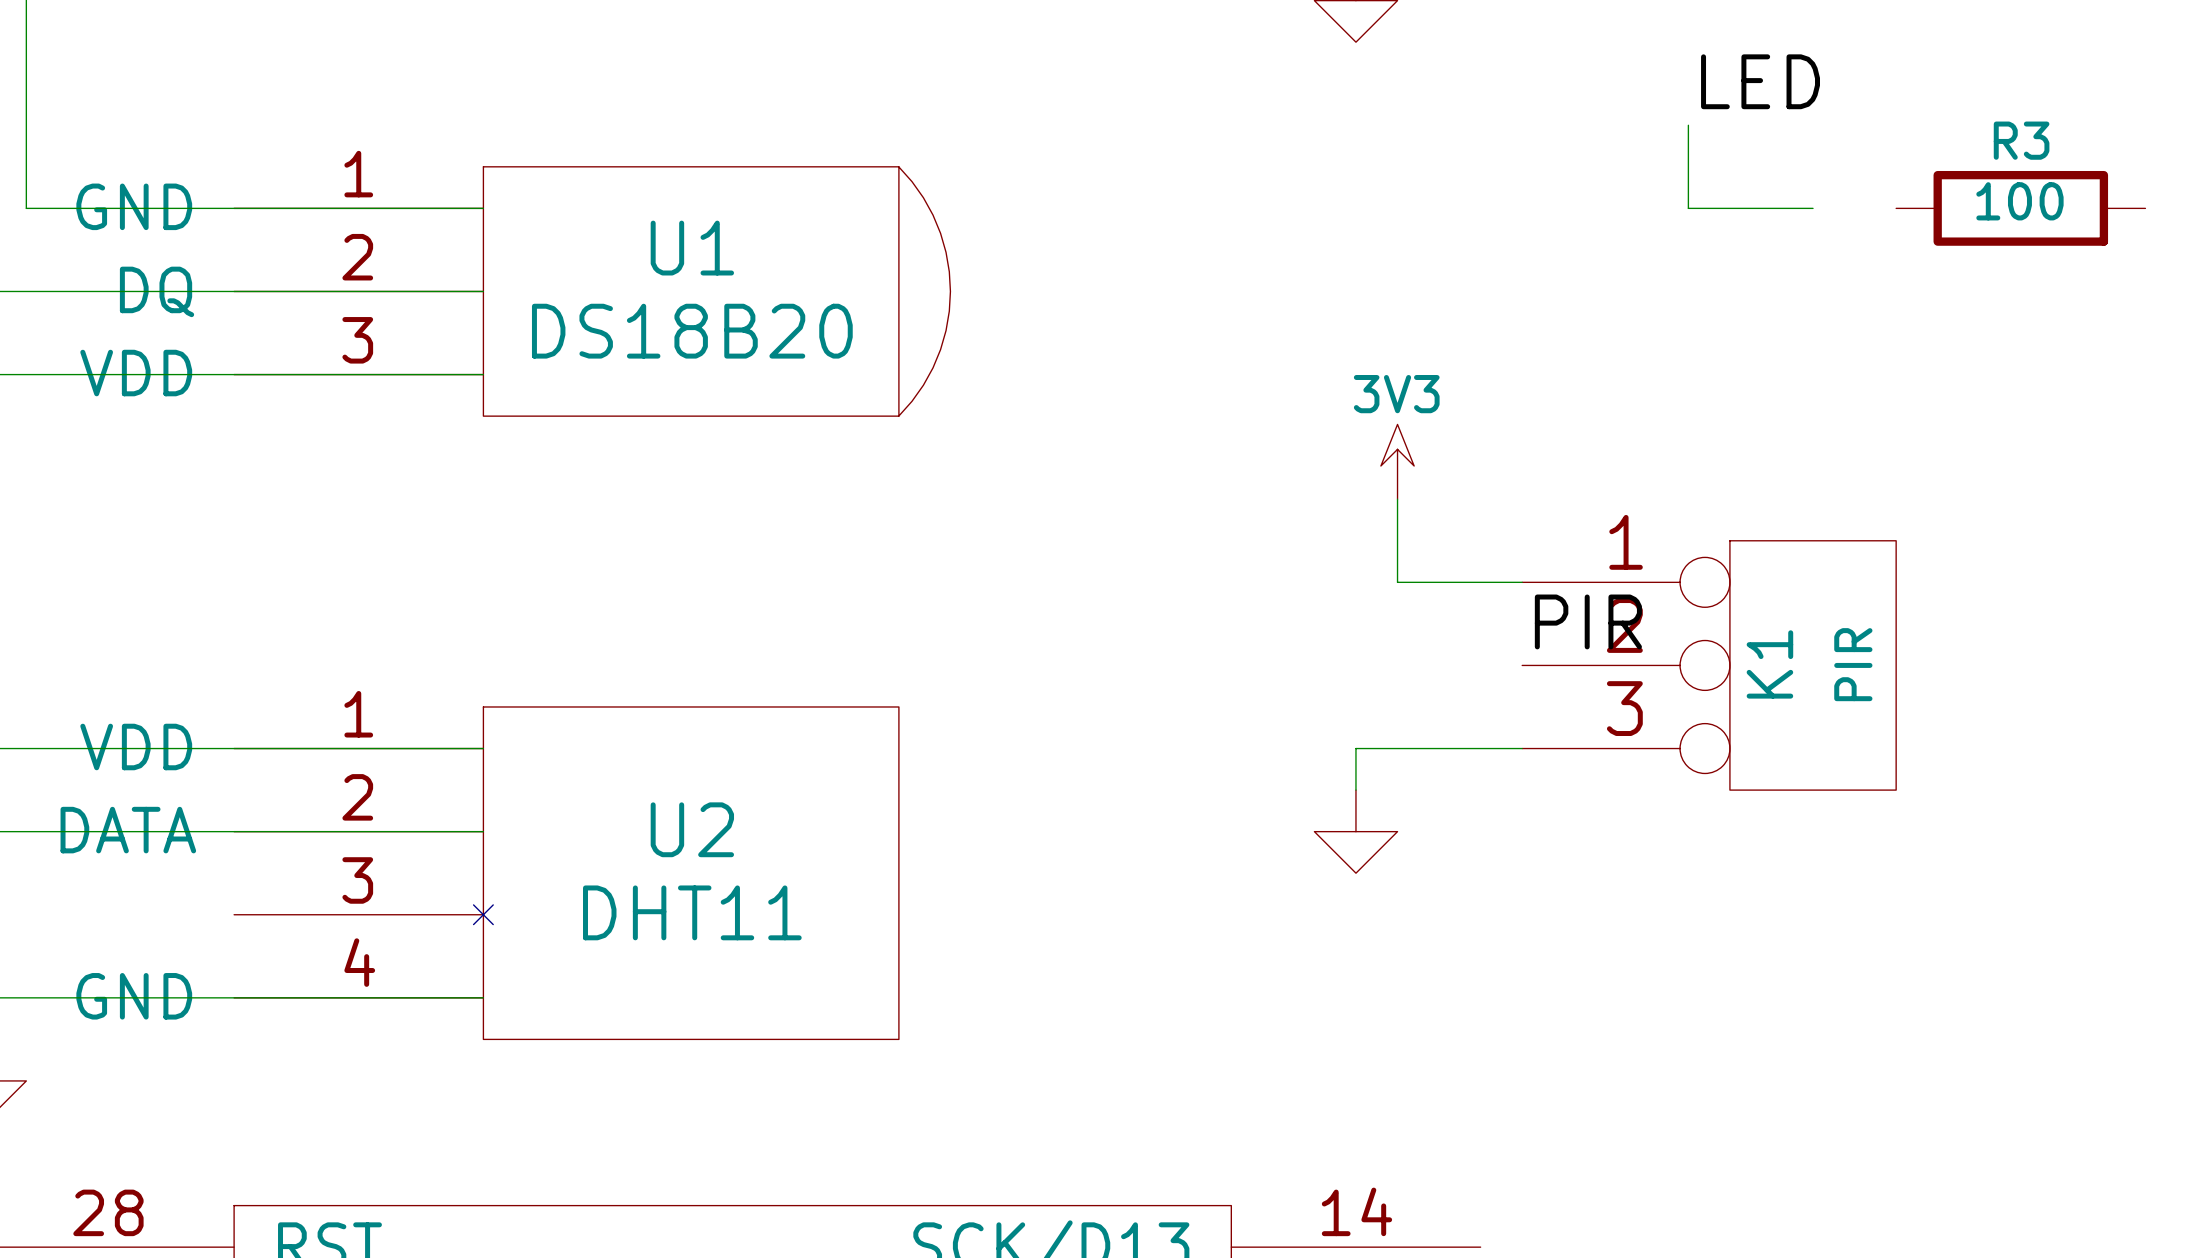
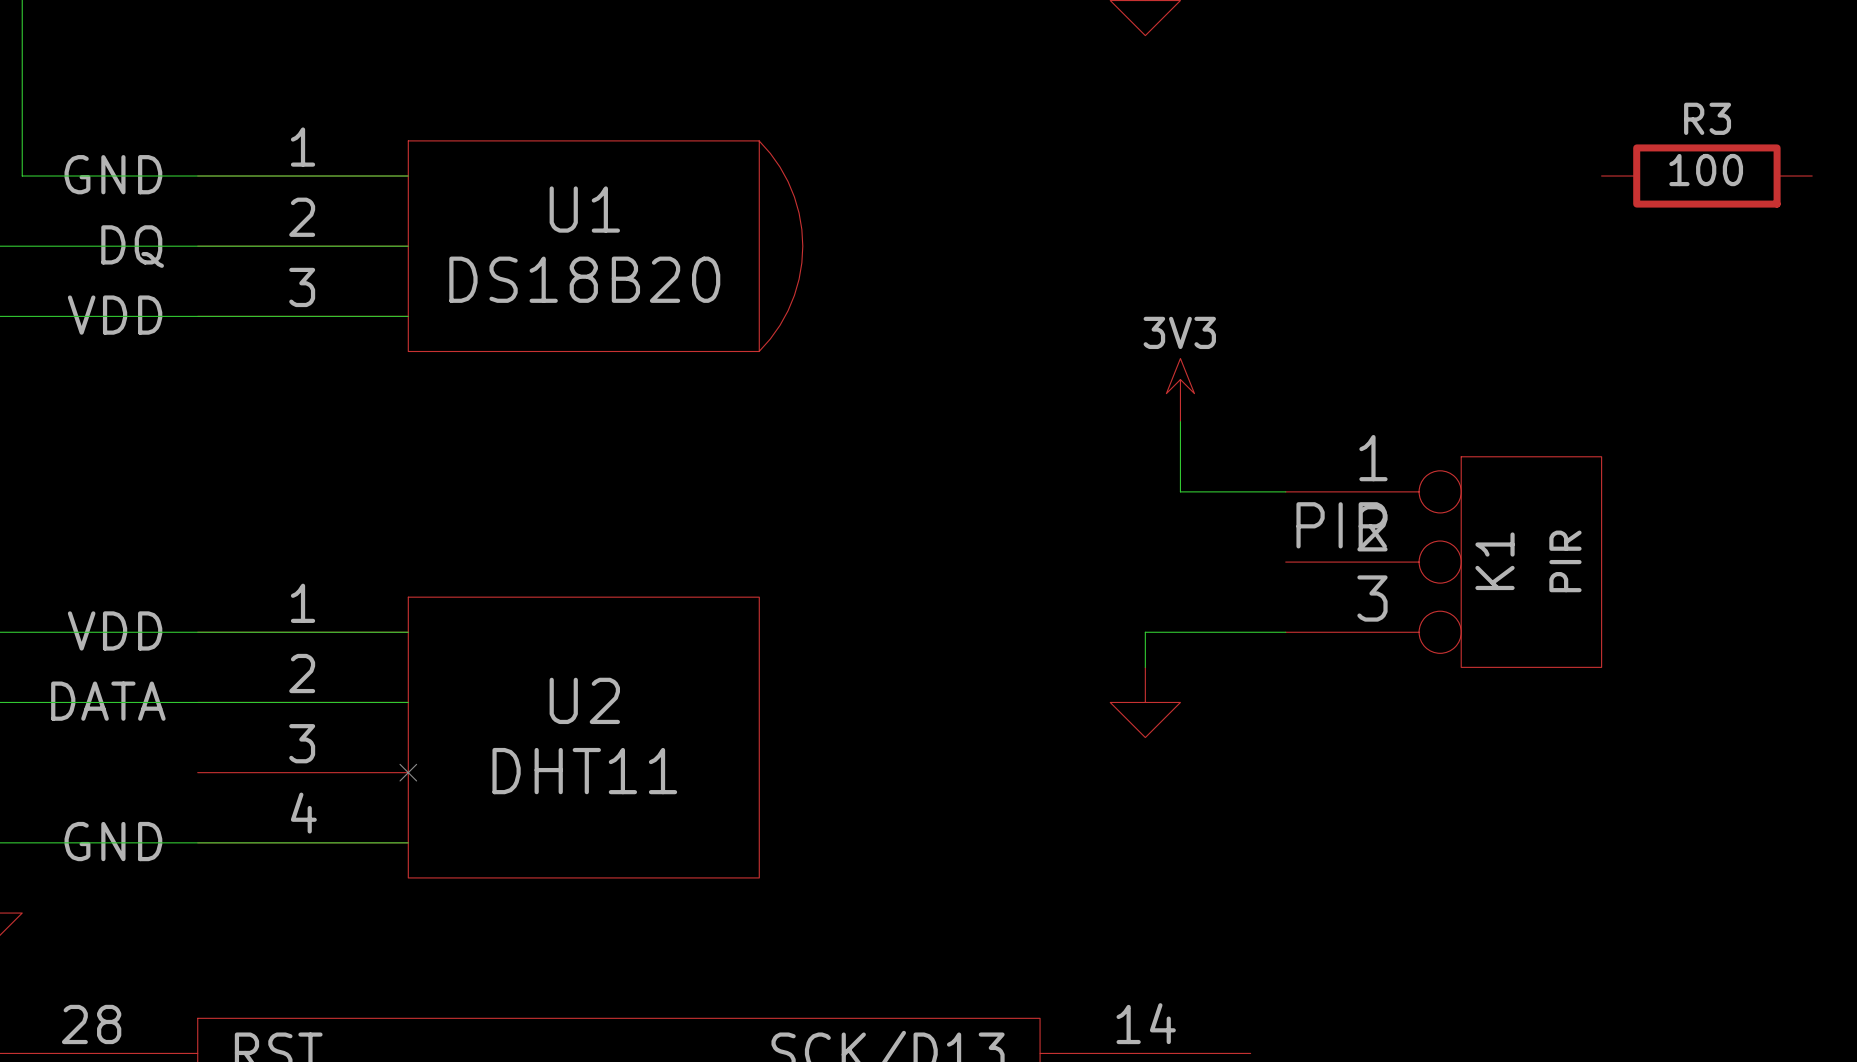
label: LED (1760, 81) -> none
wire: (1688, 125) (1688, 208) (1813, 208) -> none

